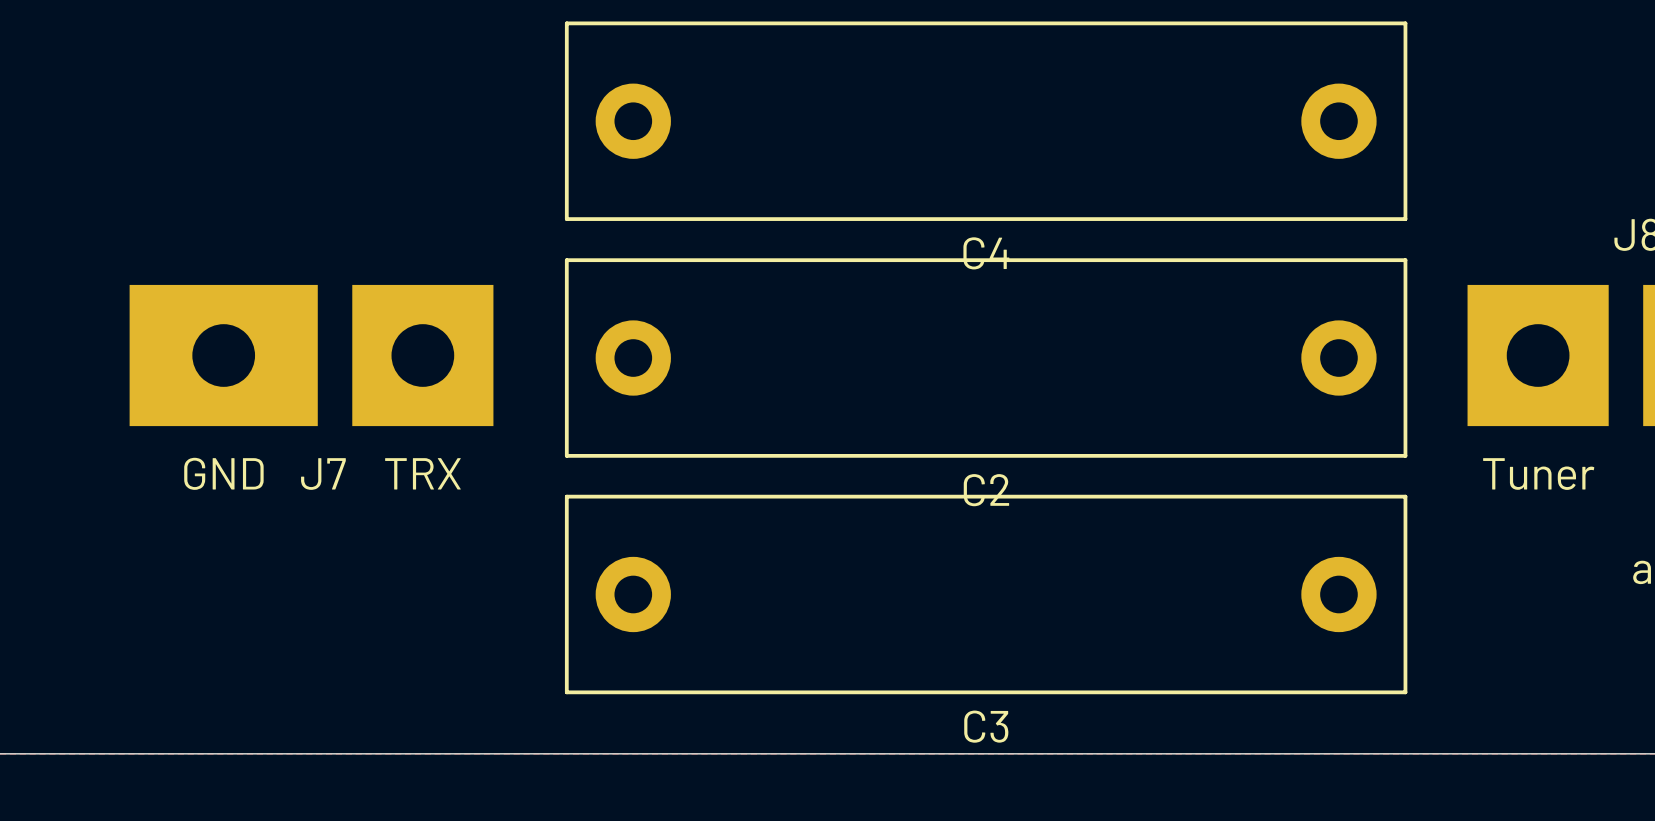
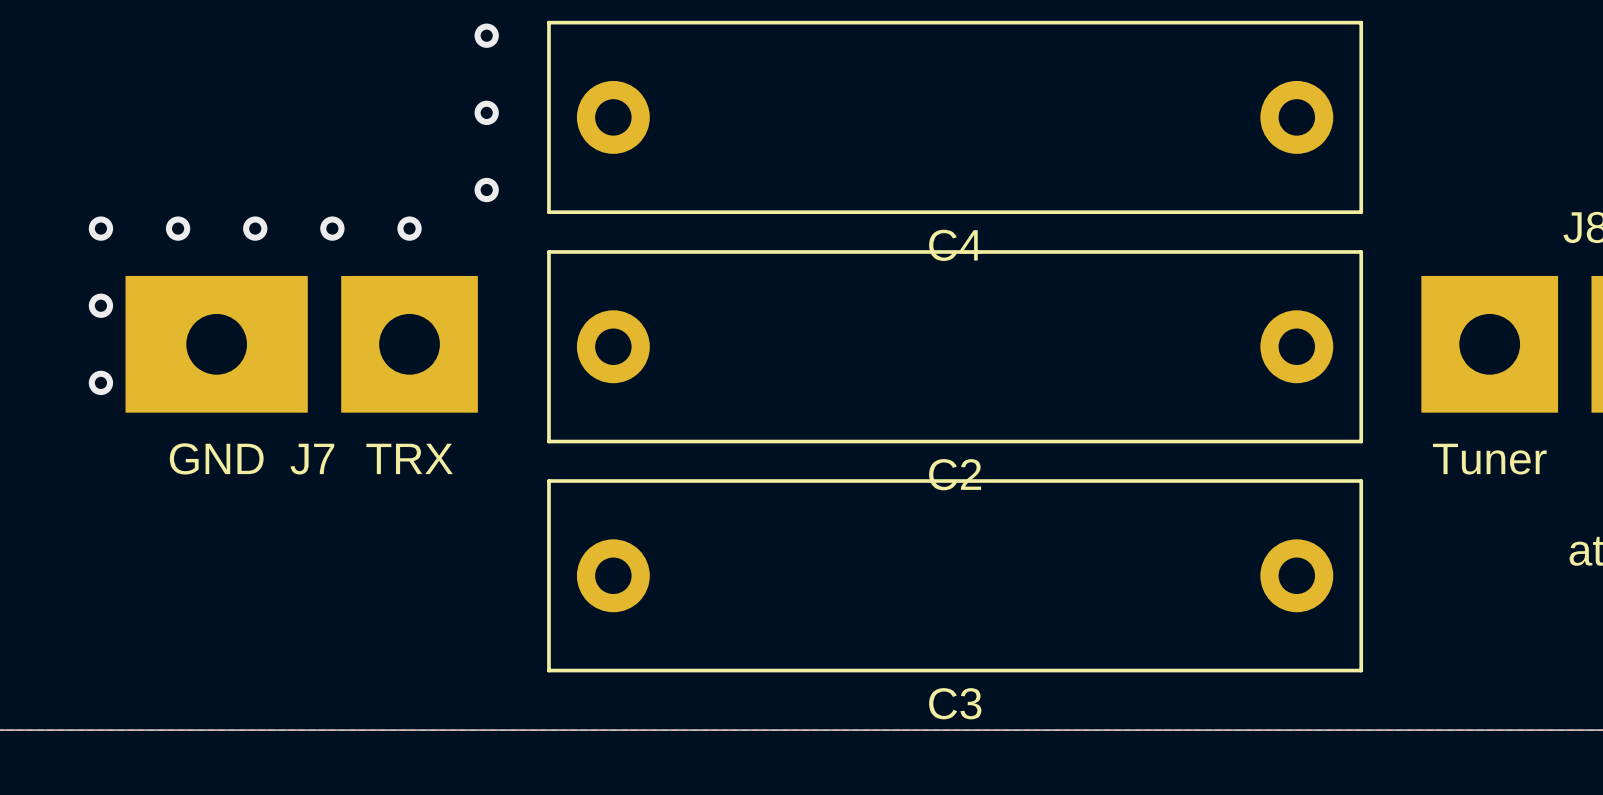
via: none -> (486, 35)
via: none -> (486, 112)
via: none -> (486, 190)
via: none -> (100, 228)
via: none -> (178, 228)
via: none -> (255, 228)
via: none -> (332, 228)
via: none -> (409, 228)
via: none -> (100, 305)
via: none -> (100, 382)

